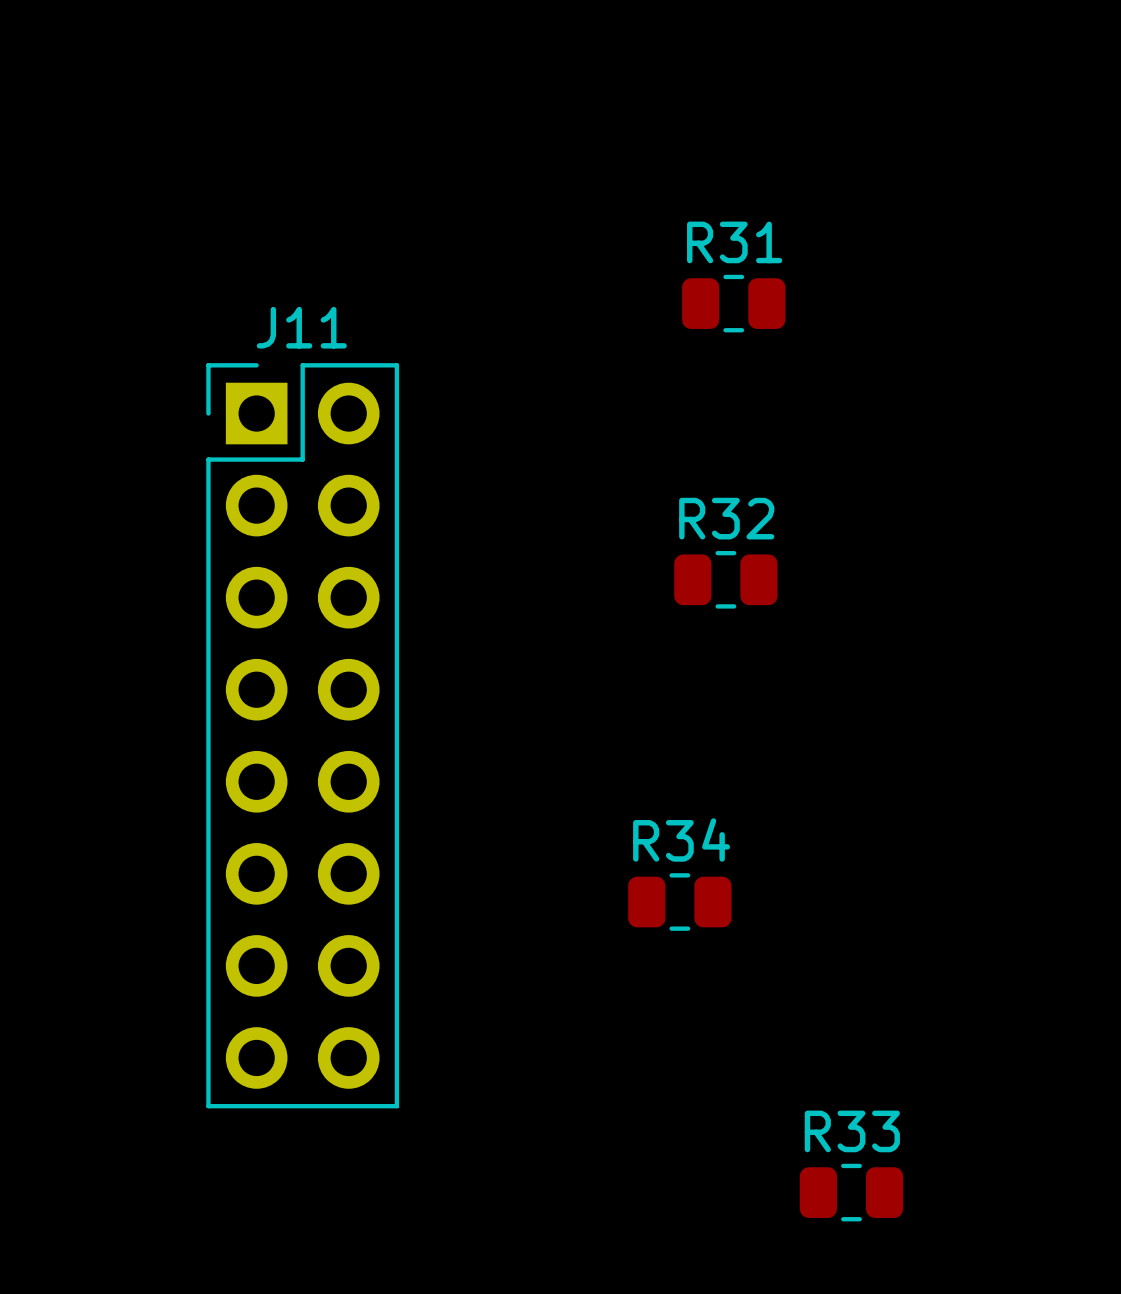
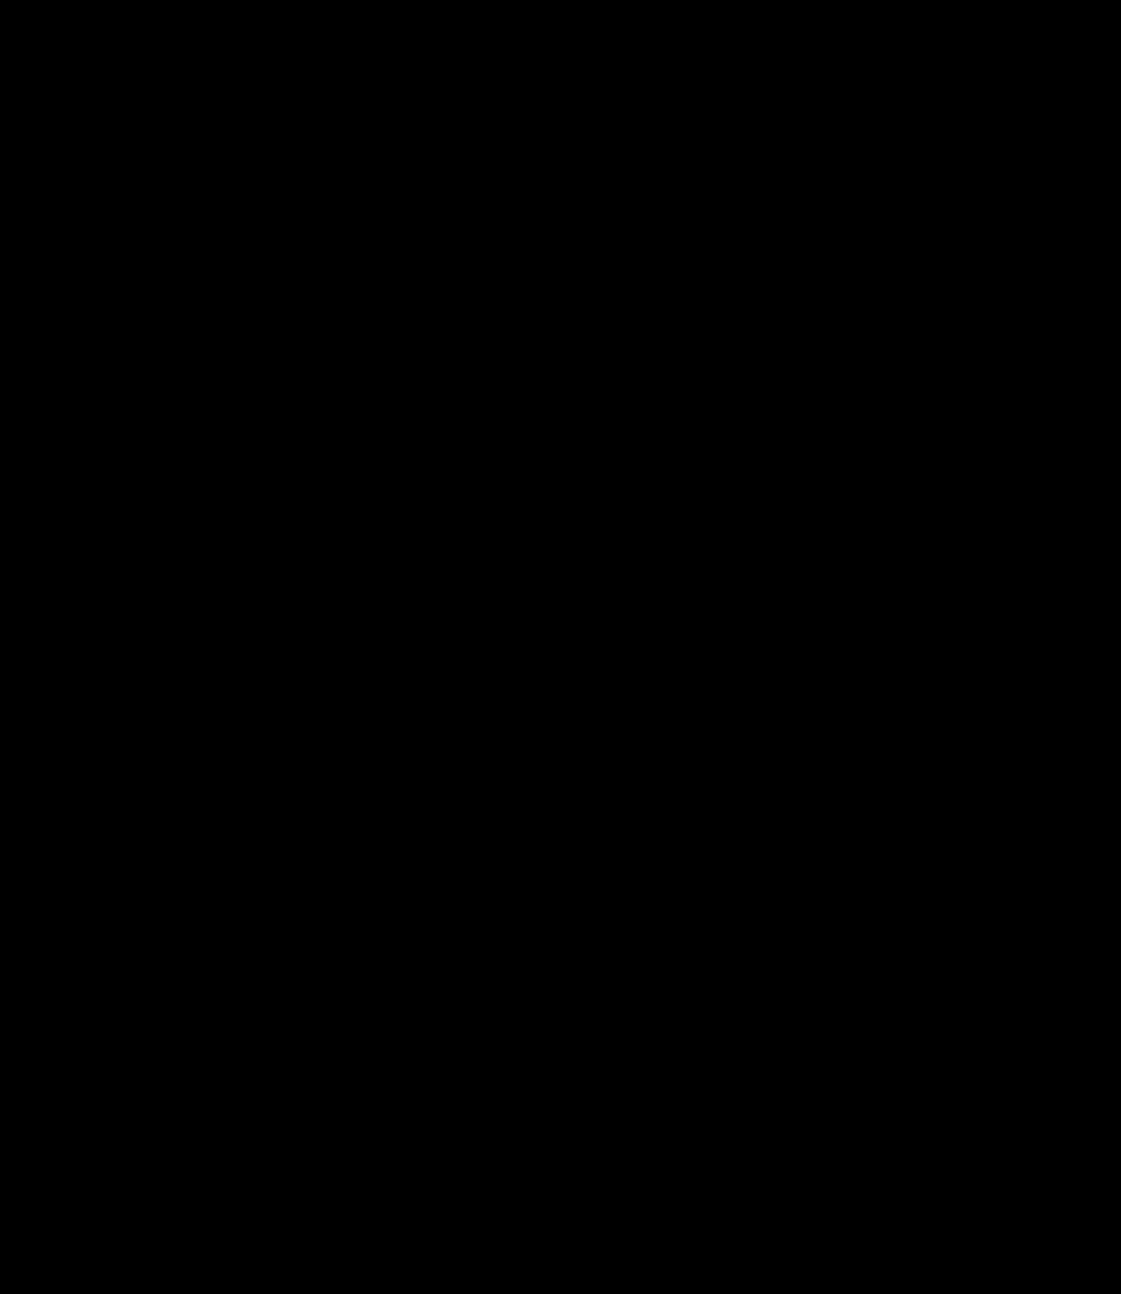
R31: (733, 303) -> none
R32: (725, 579) -> none
J11: (302, 735) -> none
R34: (679, 902) -> none
R33: (851, 1192) -> none

